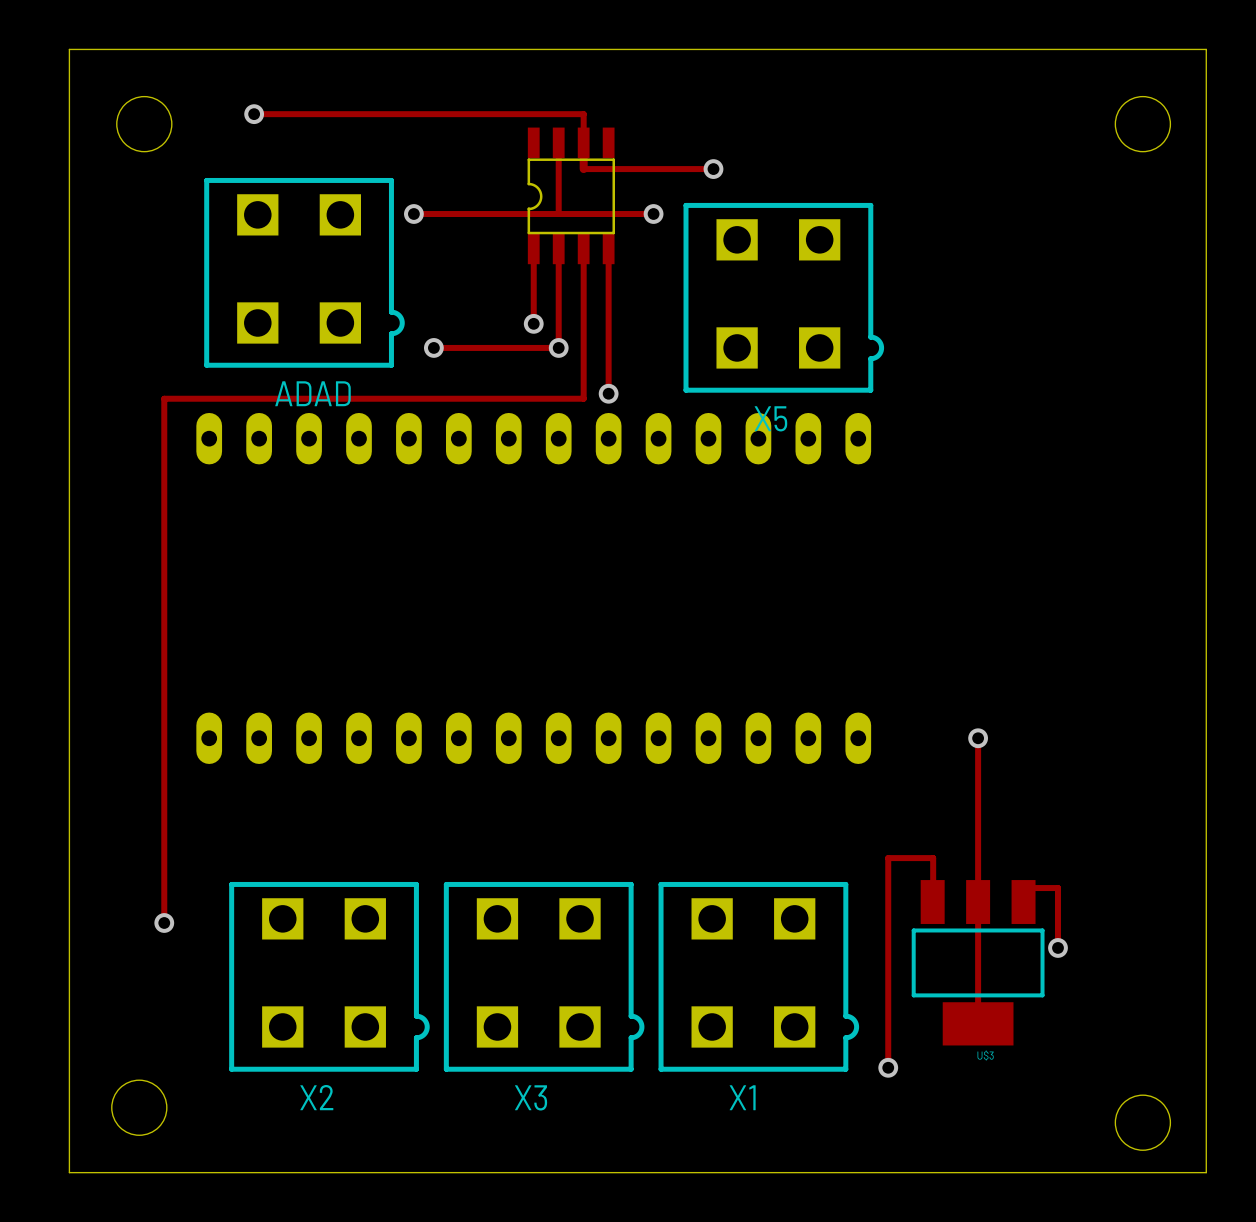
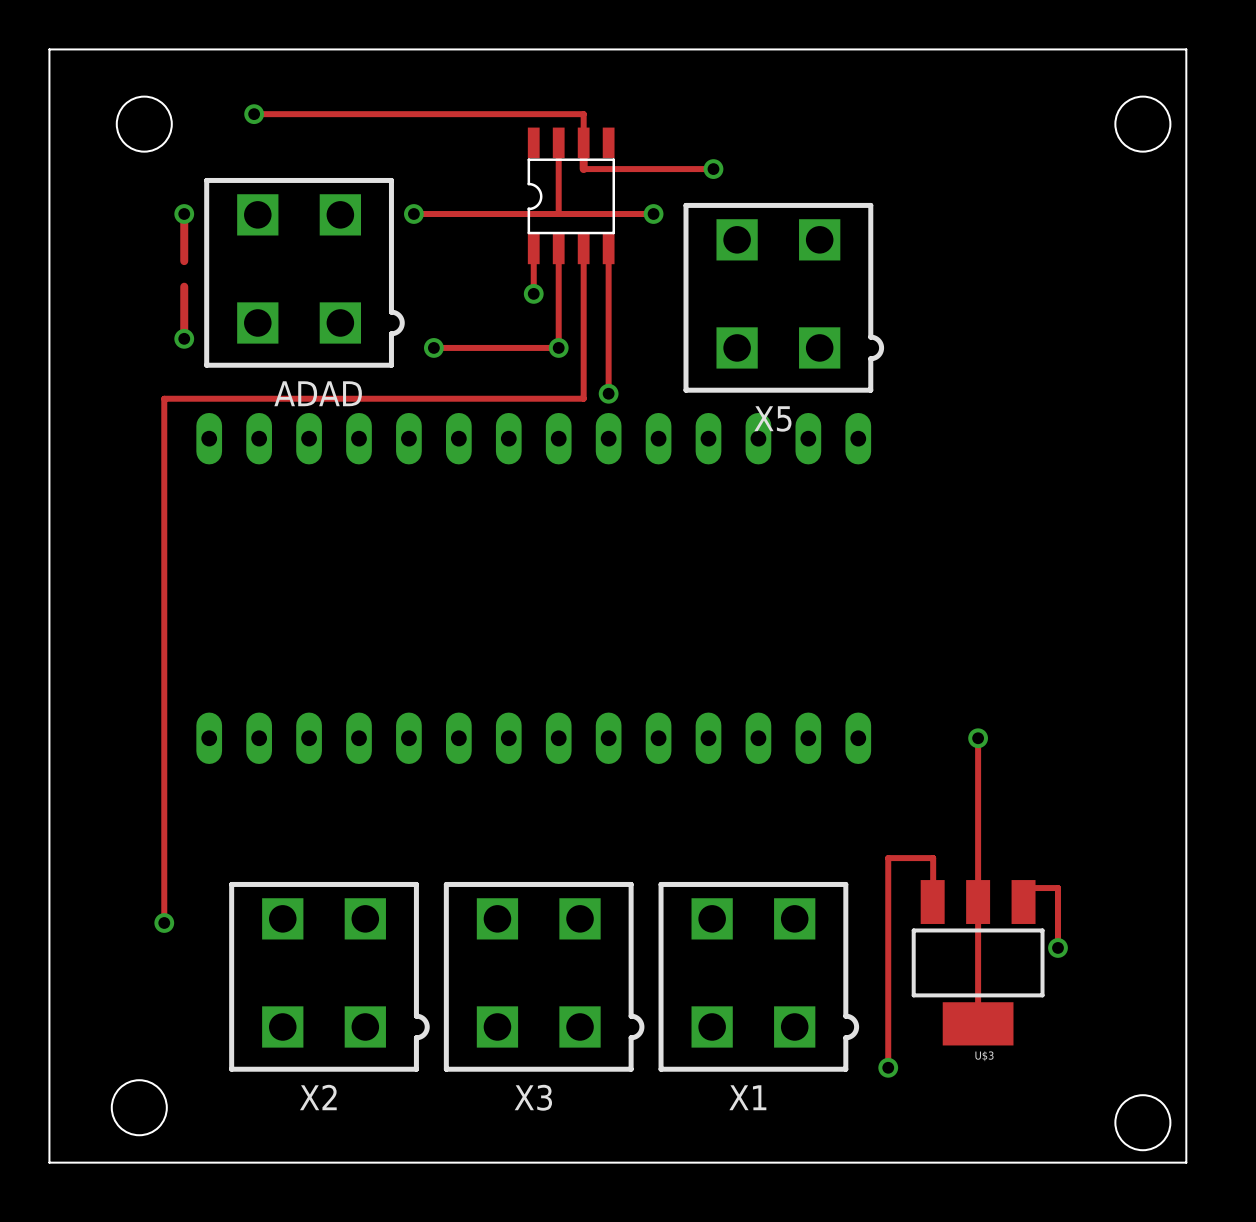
board edge: (69, 49) (69, 1172) (1206, 1172) (1206, 49) (1186, 49) -> (69, 49) (49, 49) (49, 1162) (1186, 1162) (1186, 49)
track: none -> (184, 214) (184, 261)
via: none -> (184, 214)
track: none -> (184, 286) (184, 338)
track: (533, 293) (533, 323) -> none
via position: (533, 323) -> (533, 293)
via: none -> (184, 338)

